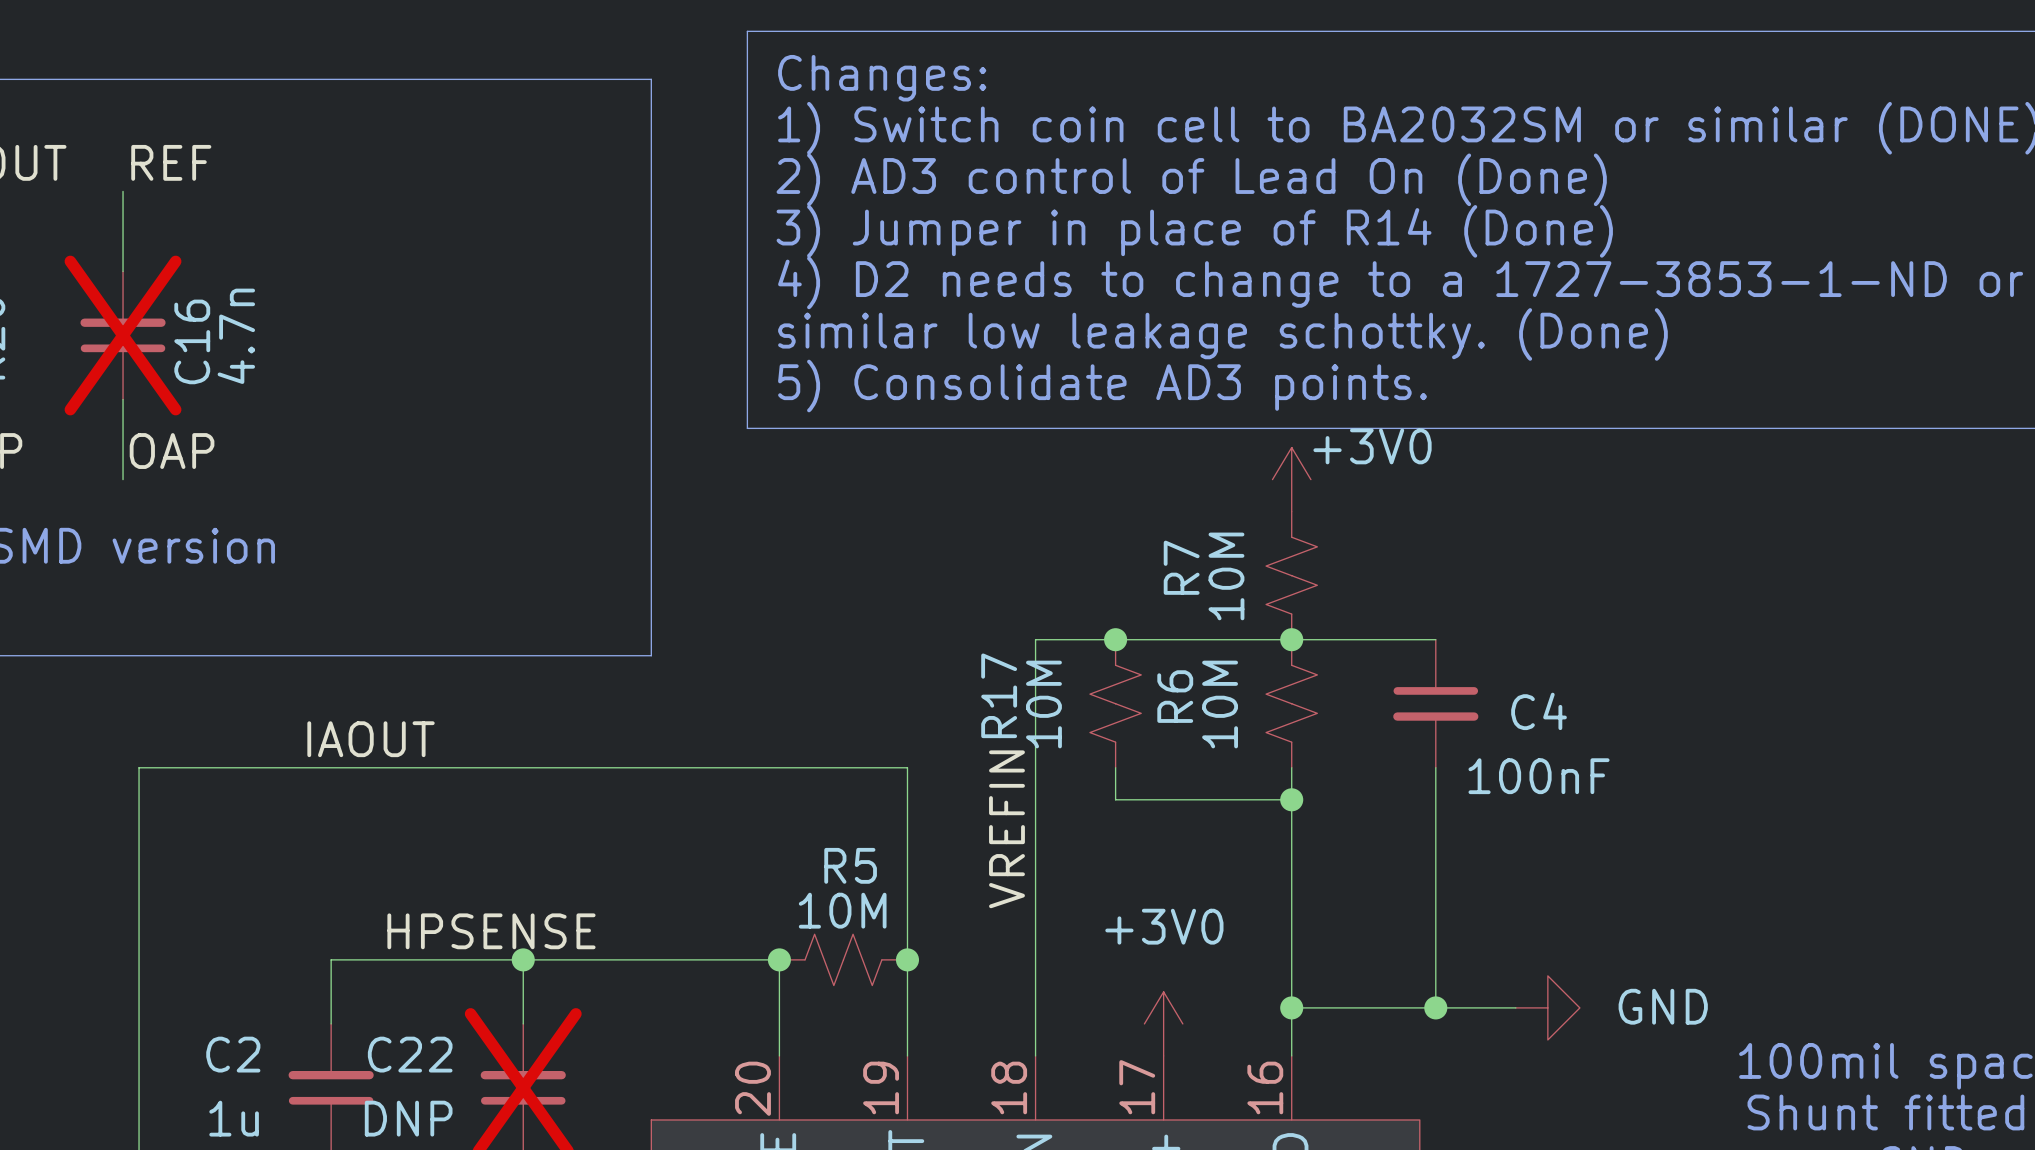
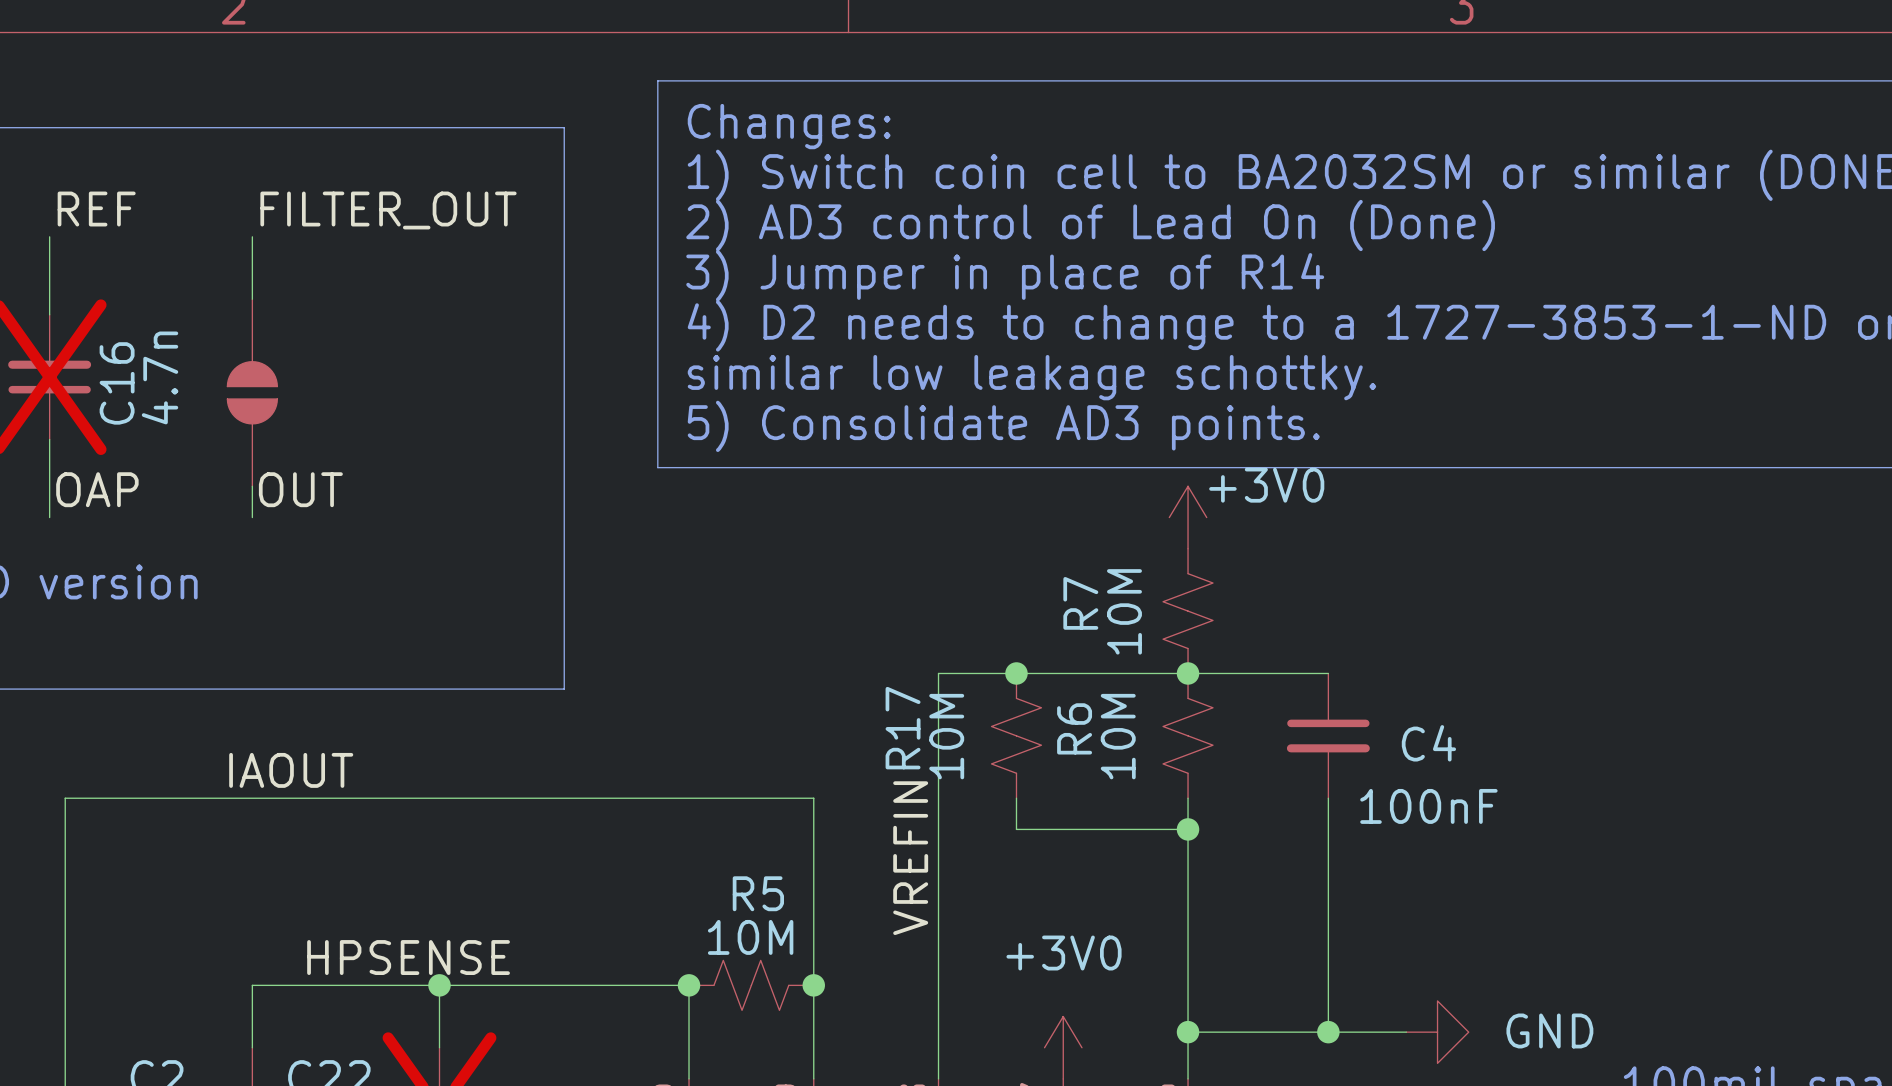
label: none -> FILTER_OUT (388, 210)
wire: none -> (252, 236) (252, 299)
text: 3) Jumper in place of R14 (Done) (1194, 231) -> 3) Jumper in place of R14 (1005, 275)
text: similar low leakage schottky. (Done) (1222, 334) -> similar low leakage schottky. (1031, 377)
part: none -> (252, 392)
wire: none -> (252, 486) (252, 517)
label: none -> OUT (300, 489)

